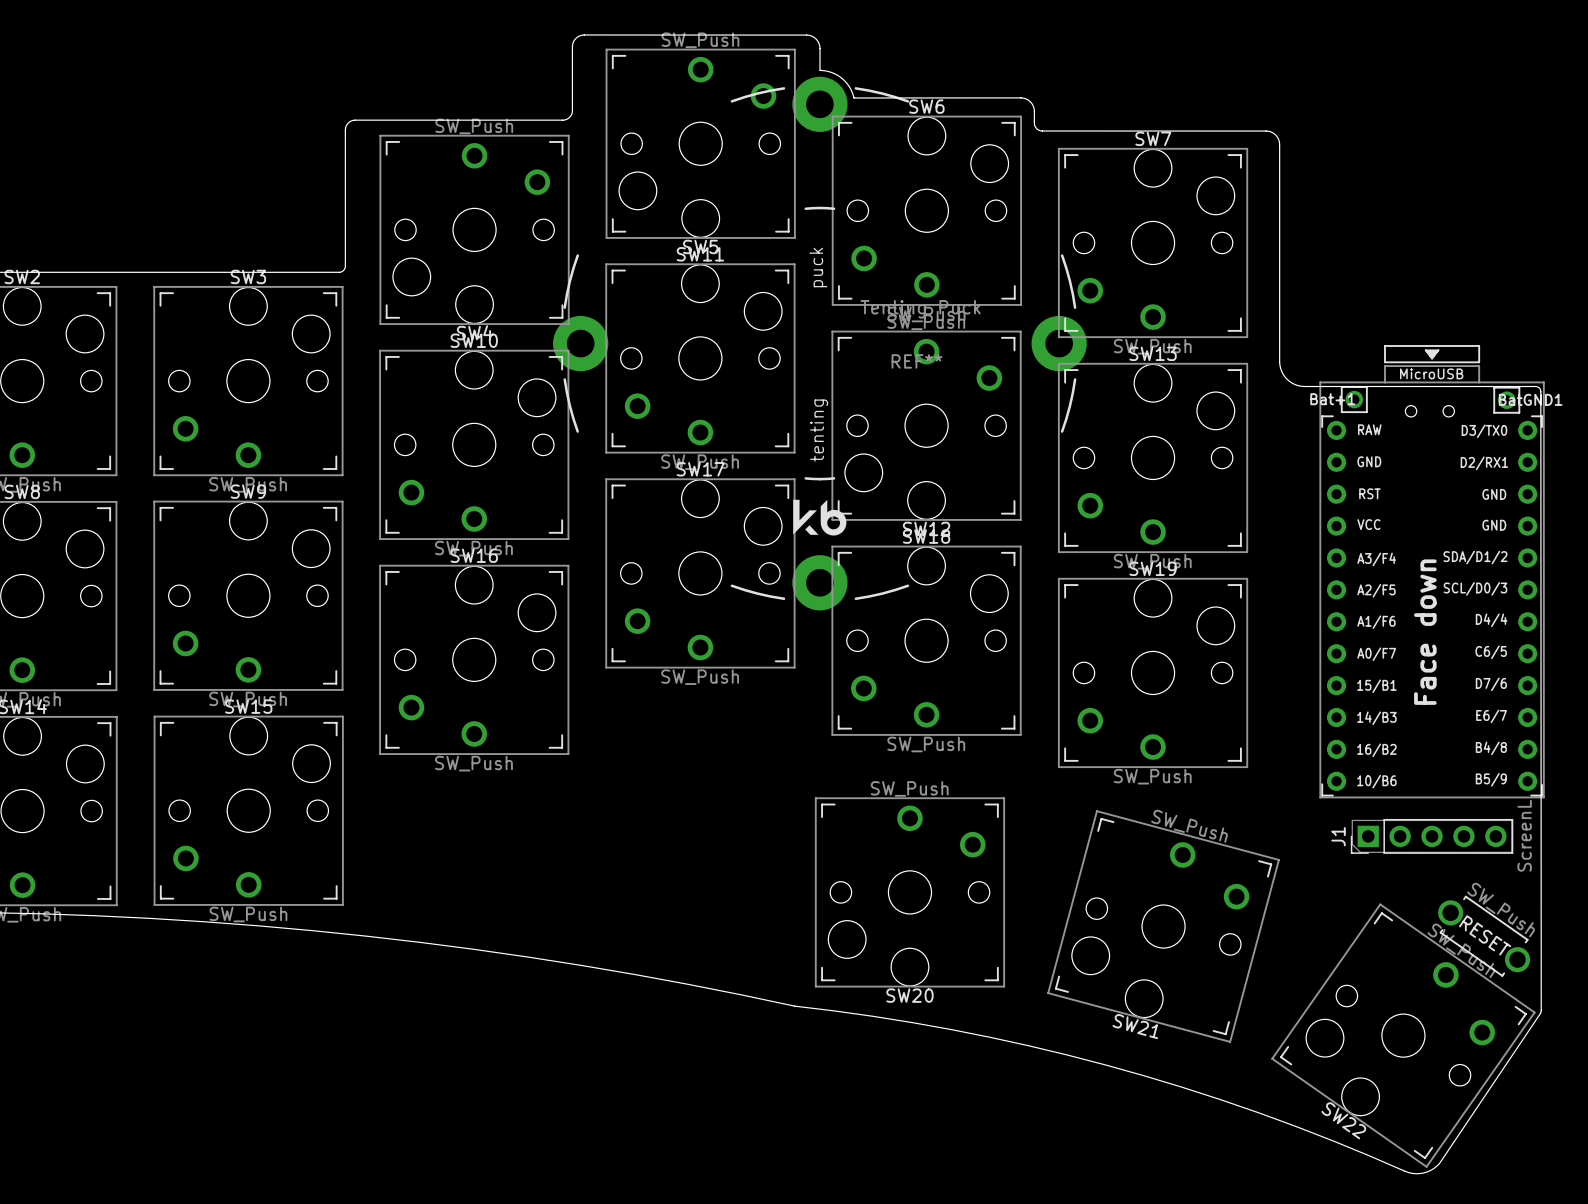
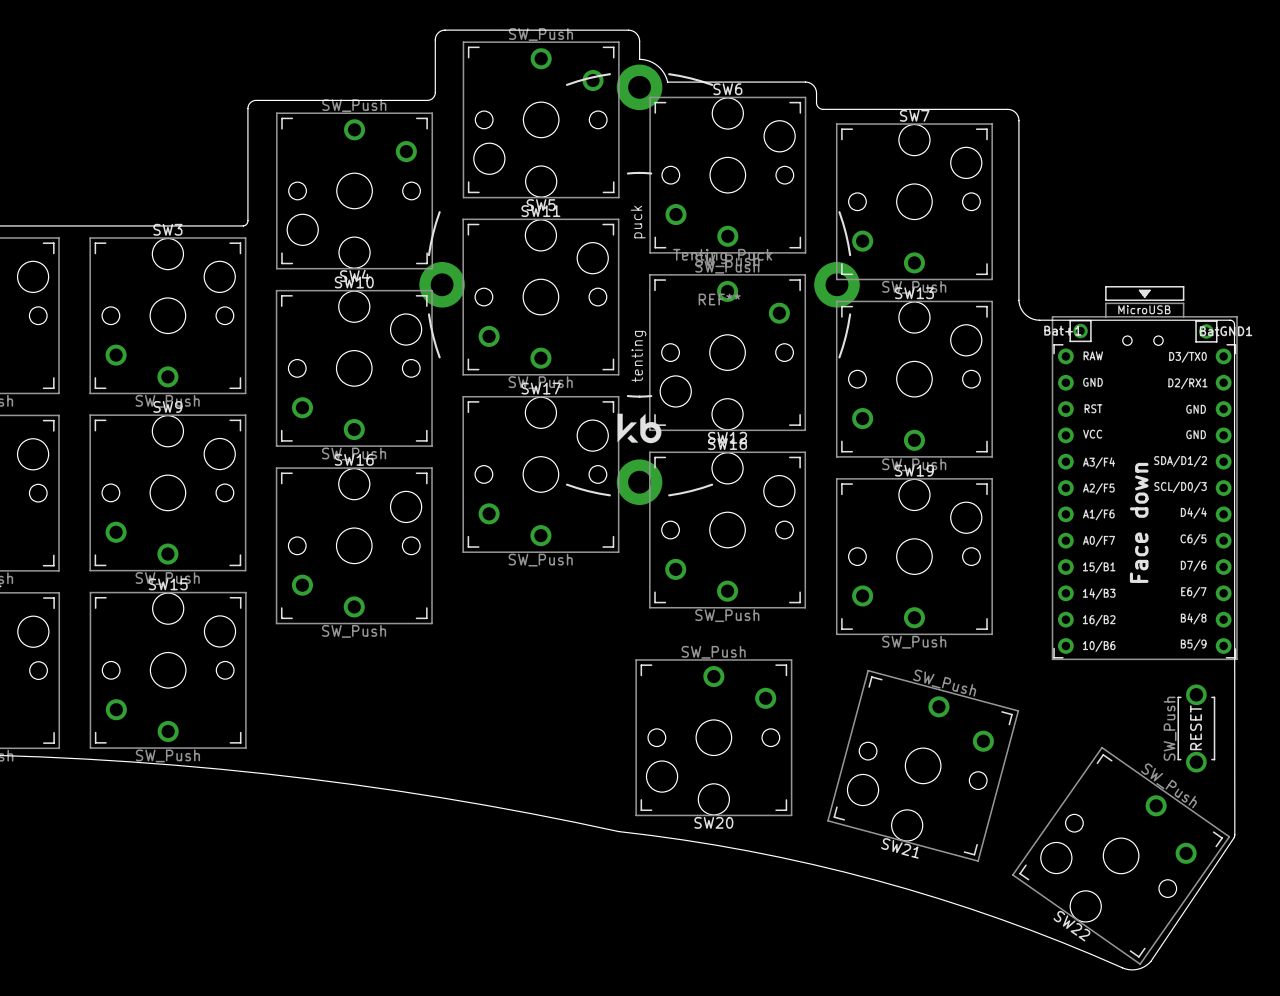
J1: ScreenL (1432, 836) -> none
part: none -> SW_Push (1196, 728)
part: SW_Push (1484, 936) -> none

